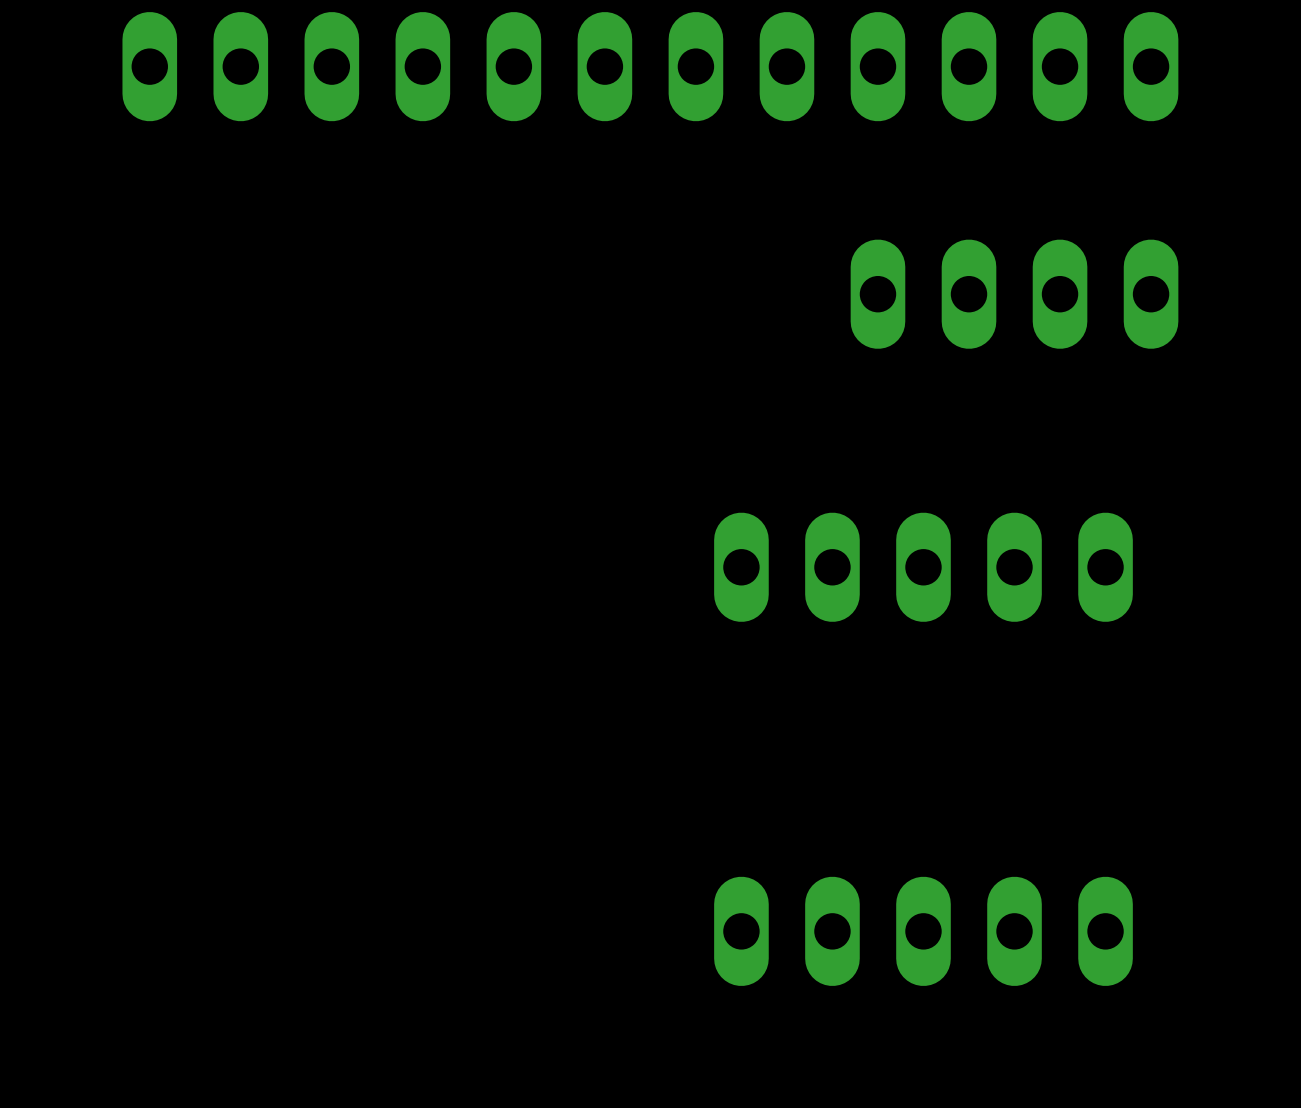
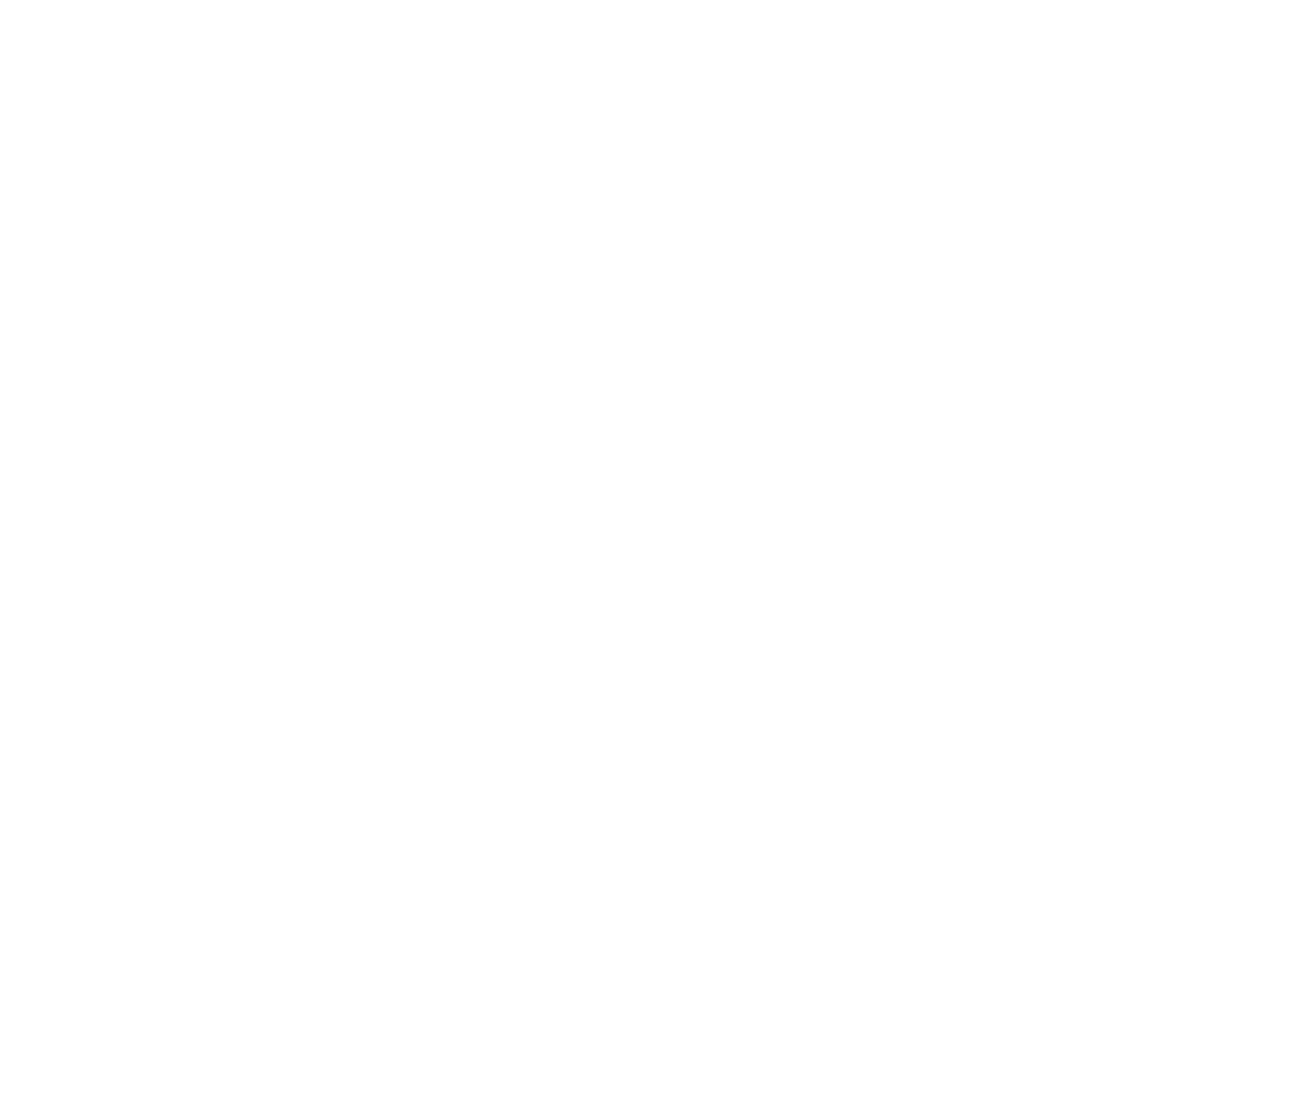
part: (650, 66) -> none
part: (1014, 294) -> none
part: (923, 567) -> none
part: (923, 931) -> none

